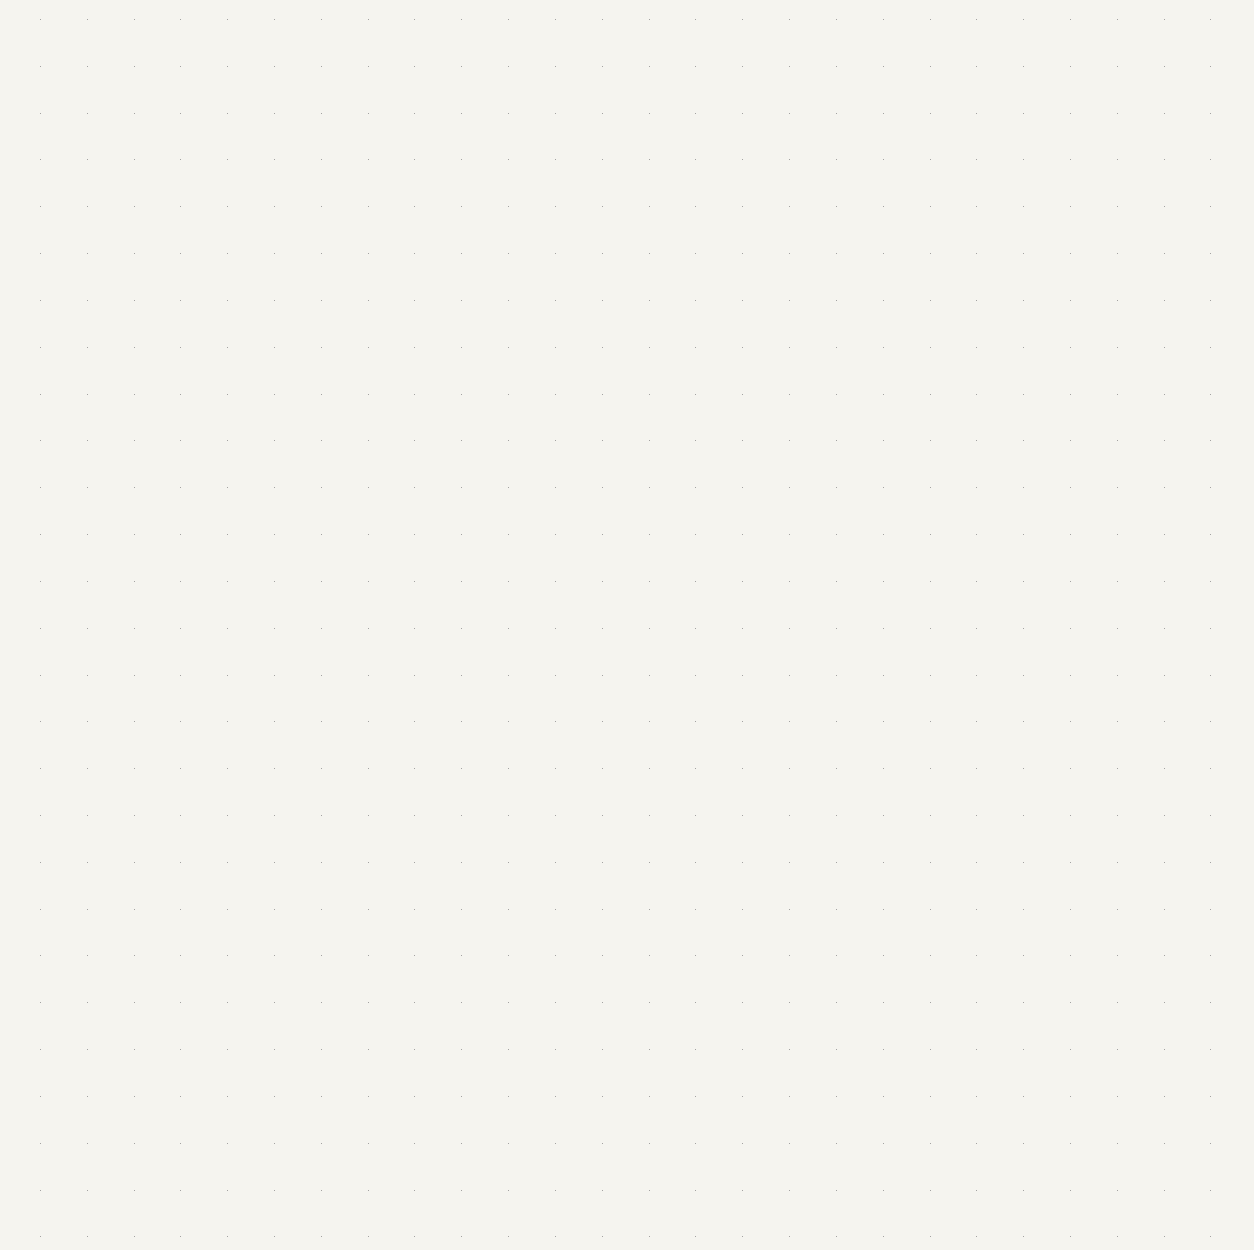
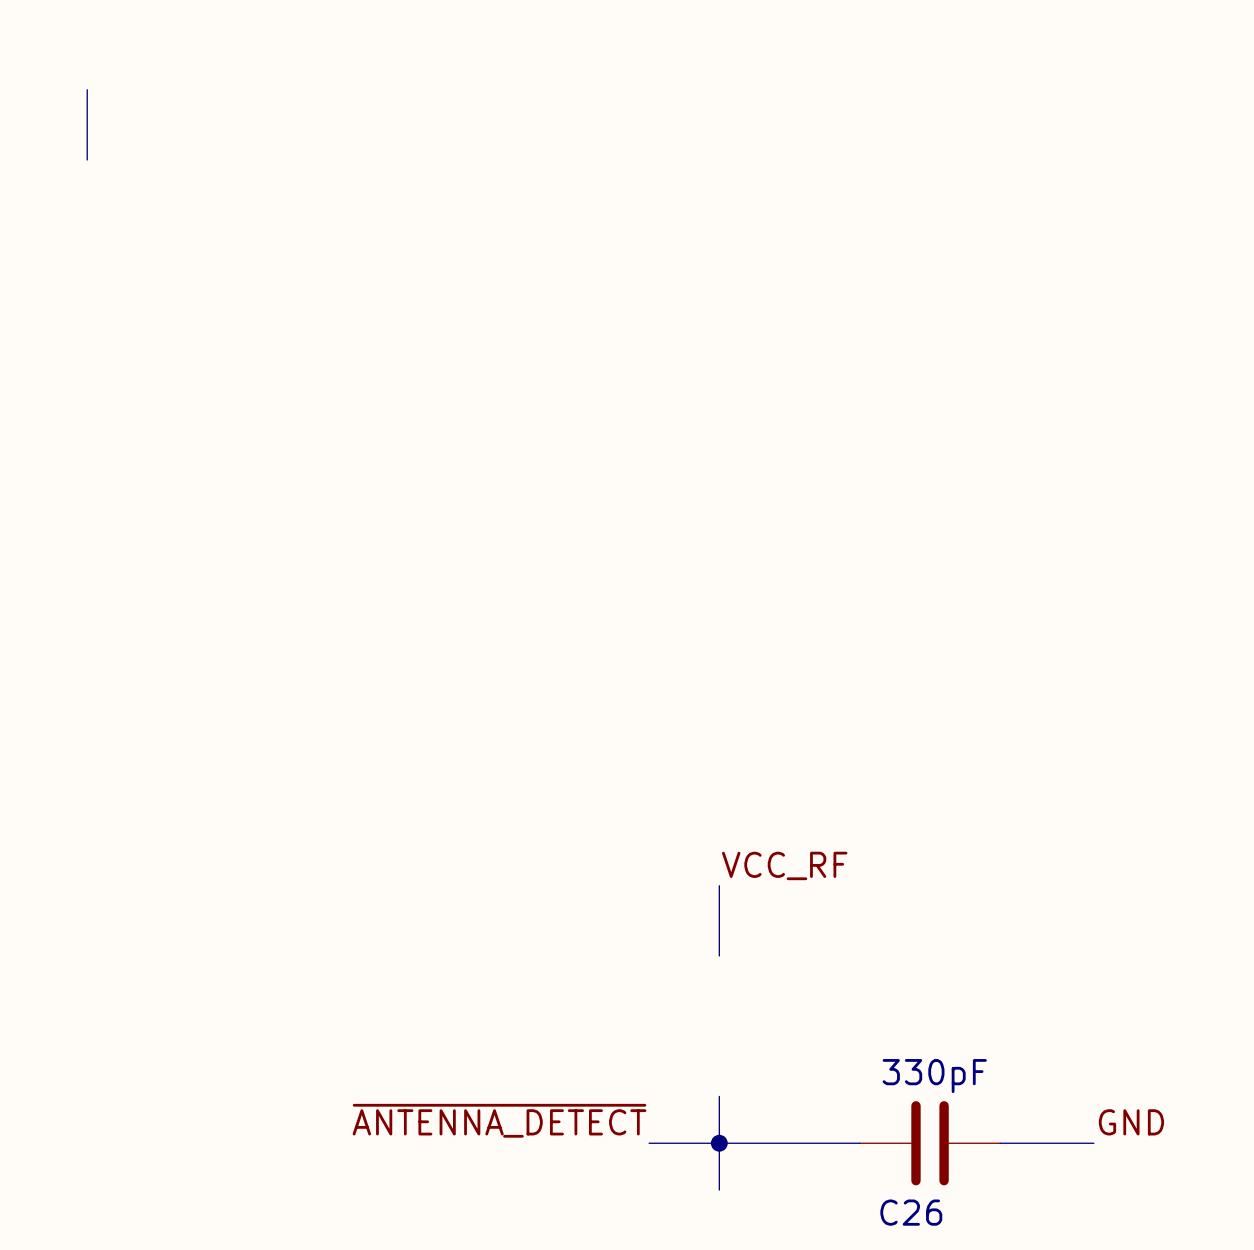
wire: none -> (87, 89) (87, 159)
label: none -> VCC_RF (784, 865)
wire: none -> (719, 885) (719, 955)
wire: none -> (719, 1096) (719, 1190)
label: none -> ~{ANTENNA_DETECT} (499, 1120)
label: none -> GND (1131, 1122)
wire: none -> (649, 1143) (859, 1143)
junction: none -> (719, 1143)
C26: none -> 330pF (930, 1143)
wire: none -> (1000, 1143) (1093, 1143)

